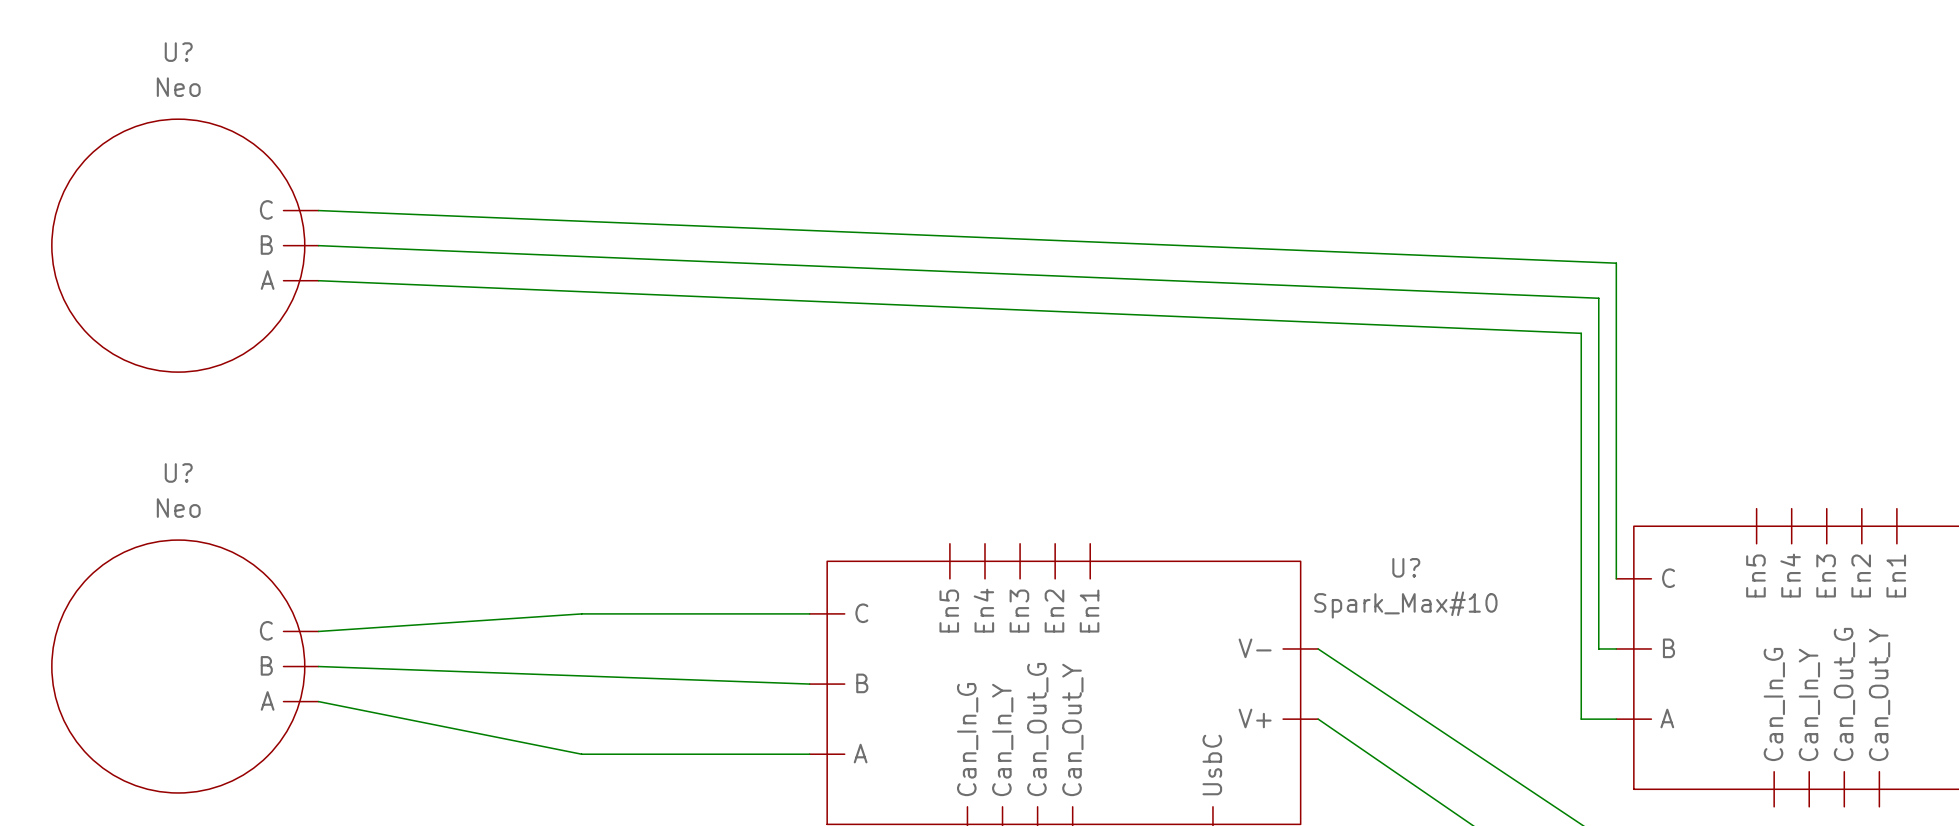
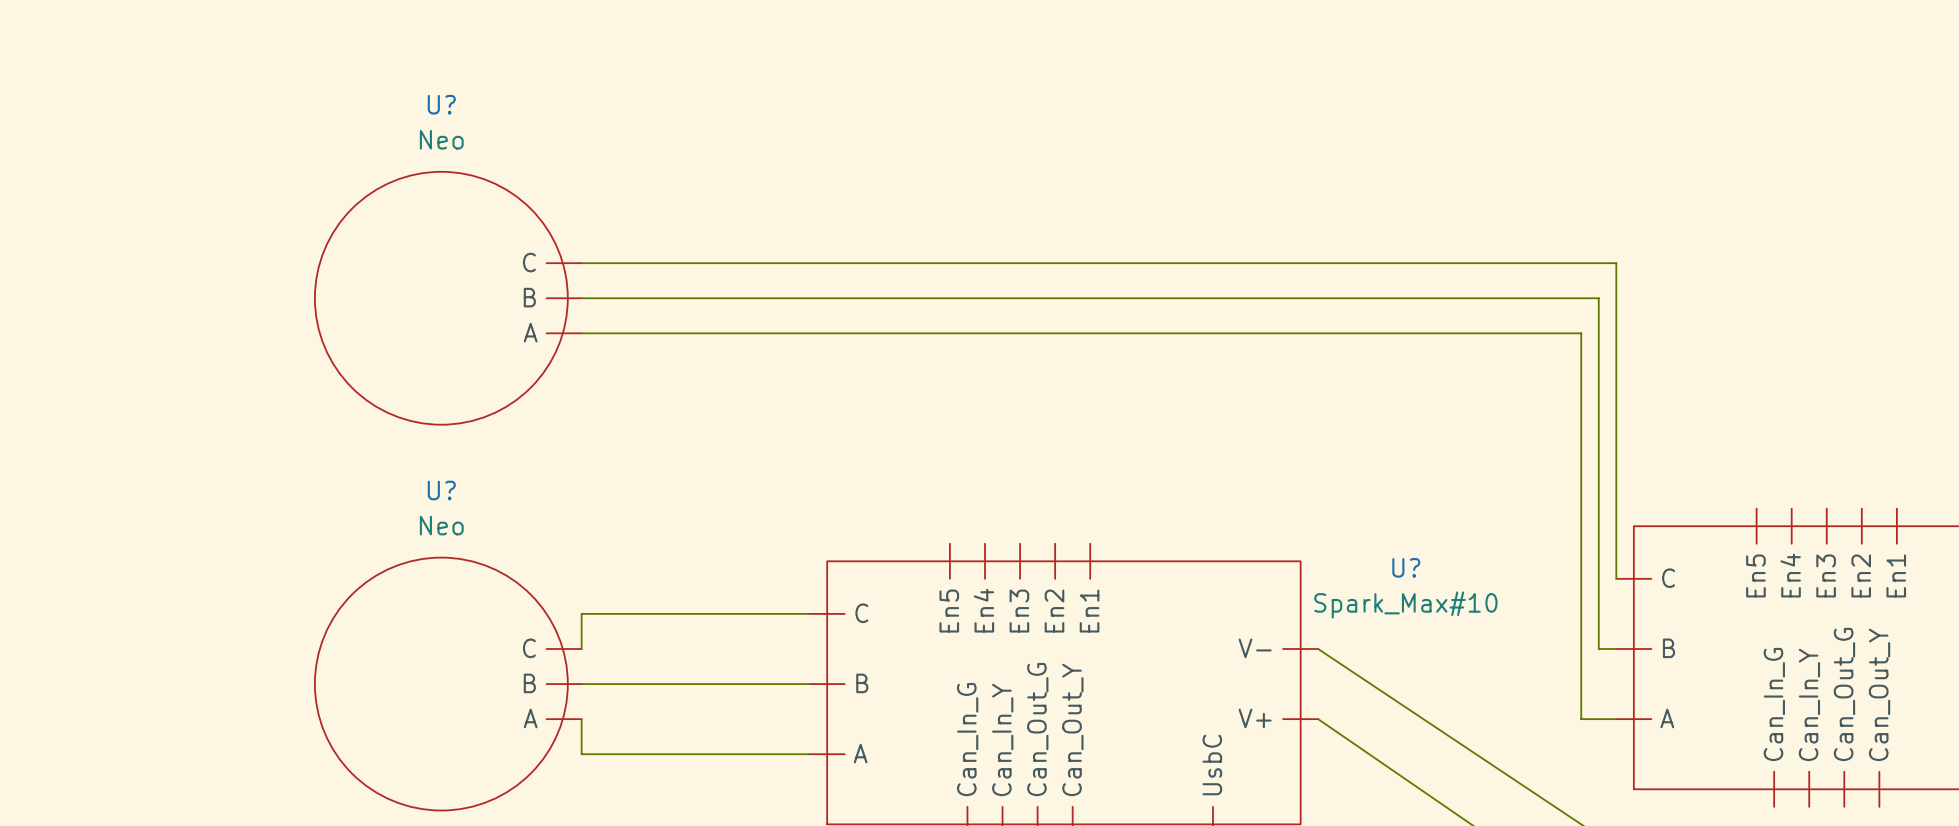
wire: (318, 210) (1616, 263) -> (581, 263) (1616, 263)
U?: Neo (185, 245) -> none
wire: (318, 245) (1598, 298) -> (581, 298) (1598, 298)
wire: (318, 280) (1581, 333) -> (581, 333) (1581, 333)
U?: none -> Neo (448, 298)
wire: (581, 613) (318, 631) -> (581, 613) (581, 648)
U?: Neo (185, 666) -> none
wire: (318, 666) (809, 684) -> (581, 684) (809, 684)
U?: none -> Neo (448, 684)
wire: (318, 701) (581, 754) -> (581, 719) (581, 754)

